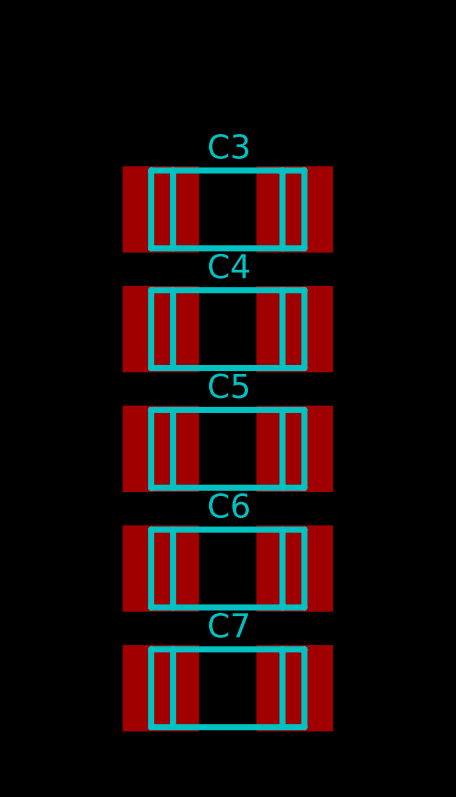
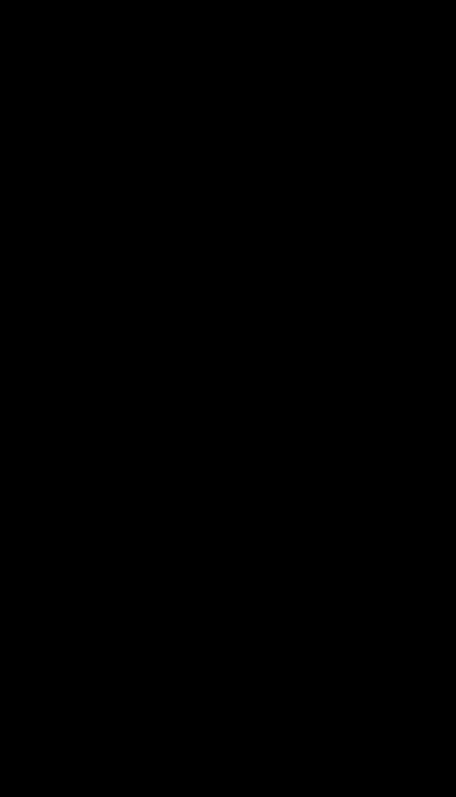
C3: (227, 209) -> none
C4: (227, 329) -> none
C5: (227, 448) -> none
C6: (227, 568) -> none
C7: (227, 688) -> none

